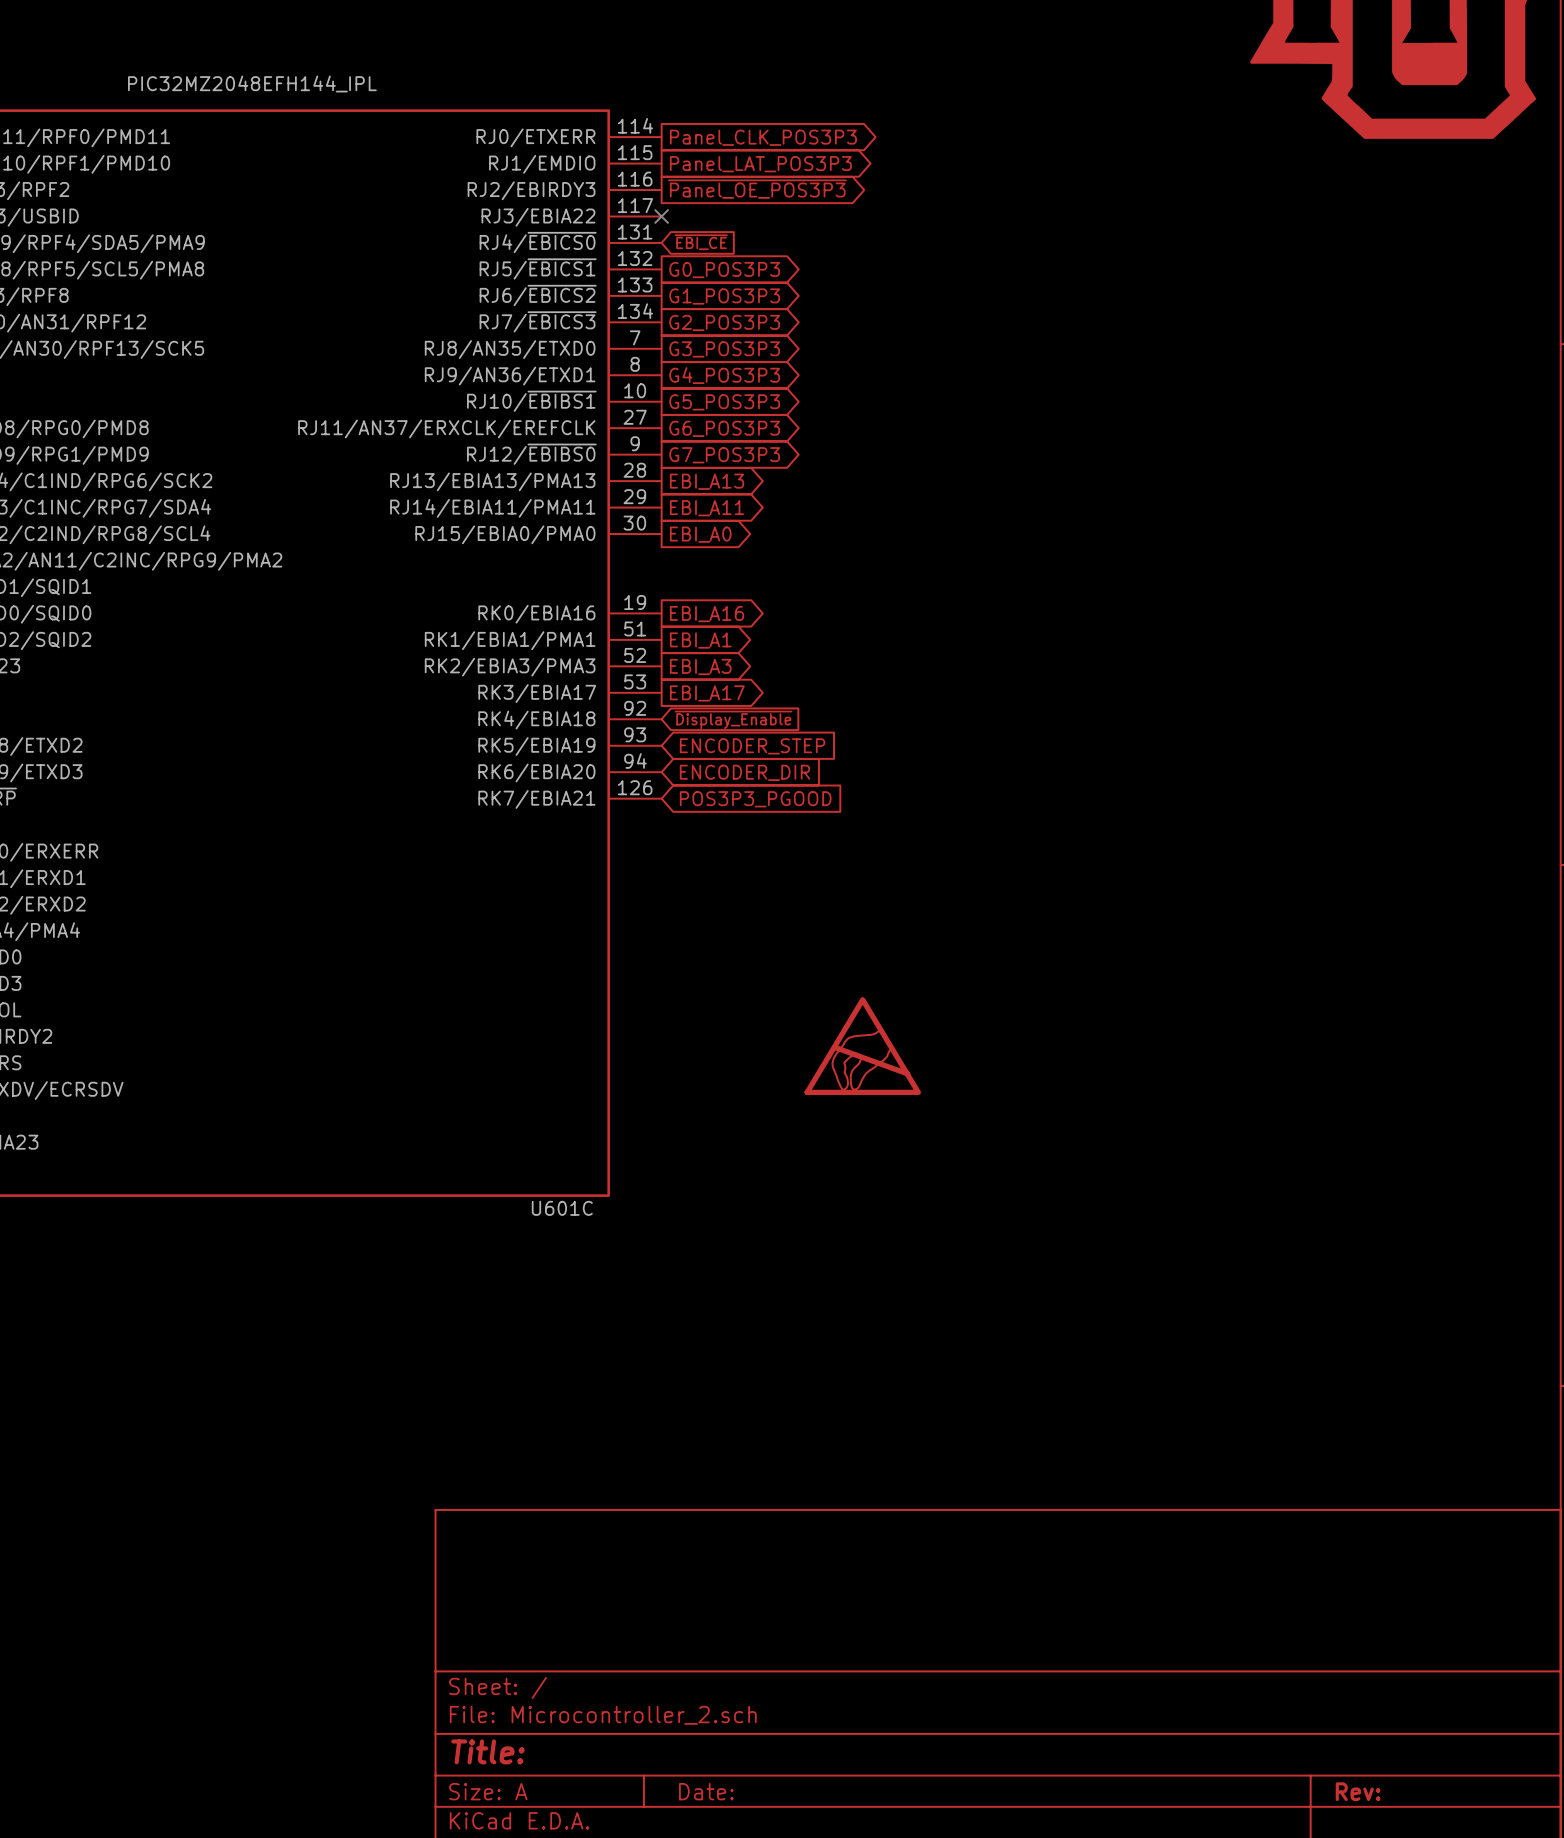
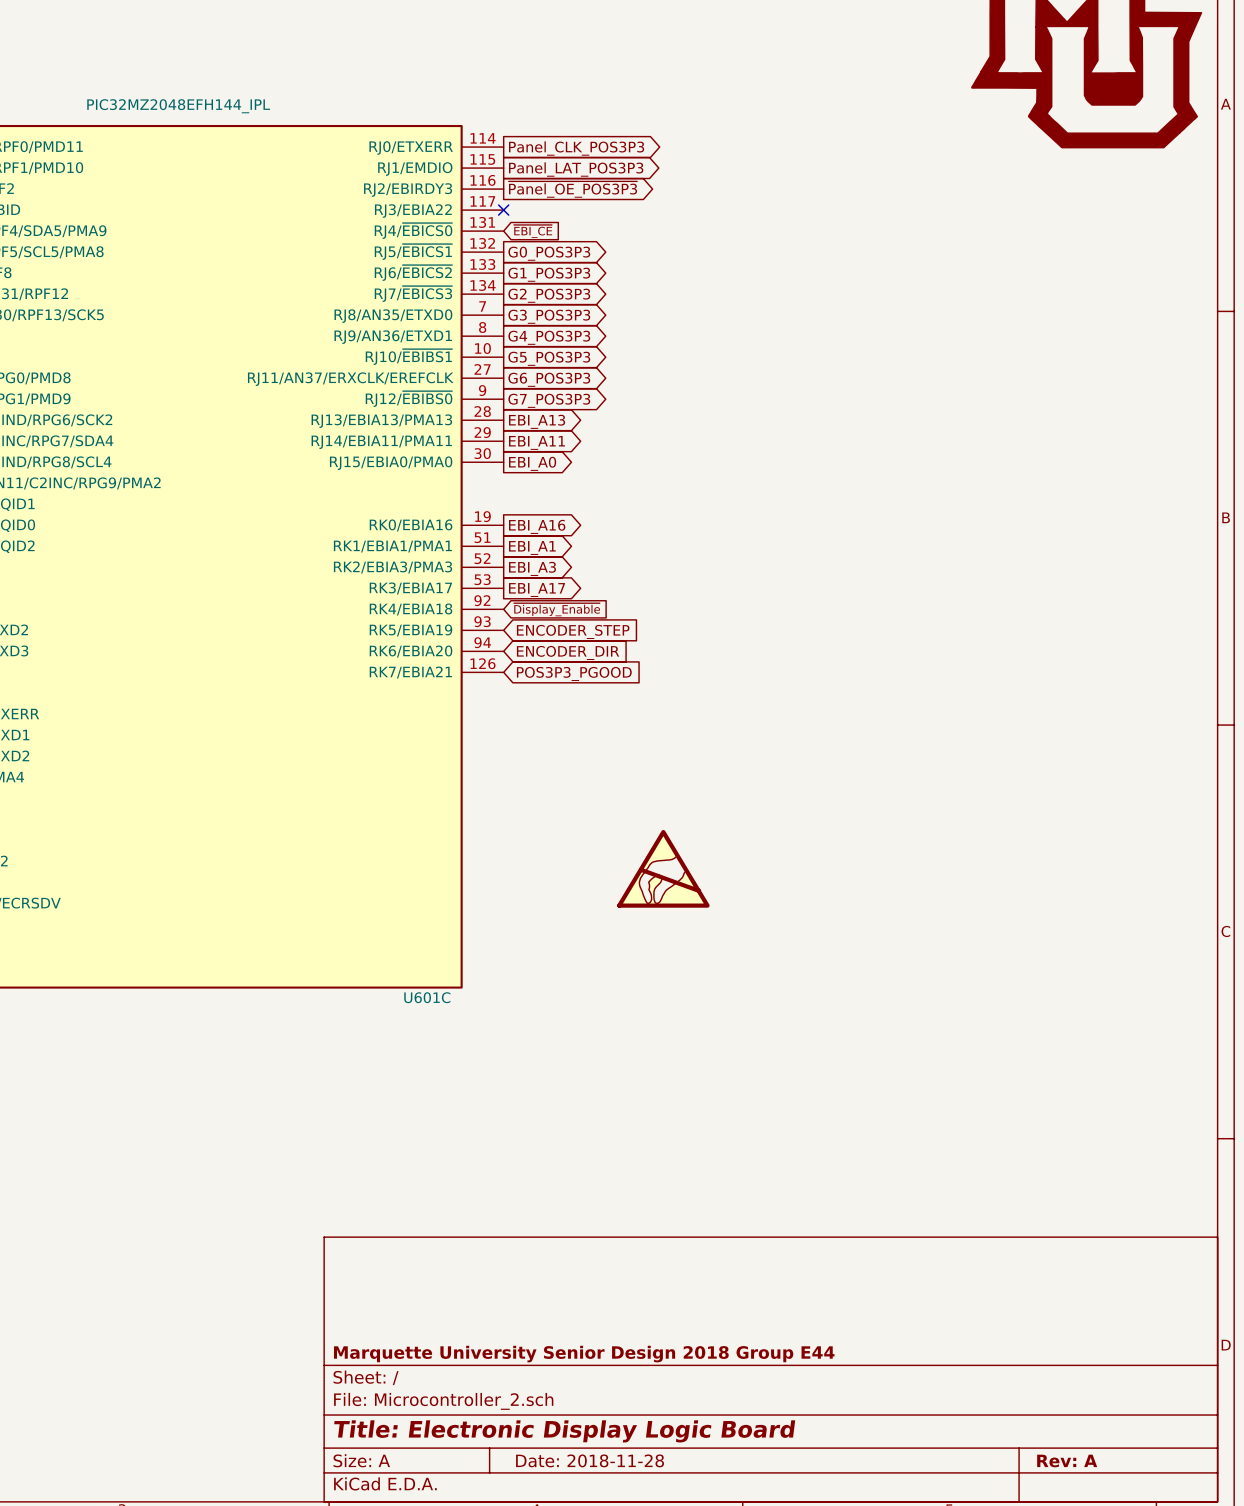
title block: none -> Marquette University Senior Design 2018 Group E44 (584, 1354)
title block: Title: (487, 1751) -> Title: Electronic Display Logic Board (564, 1431)
title block: Date: (706, 1791) -> Date: 2018-11-28 (590, 1460)
title block: Rev: (1358, 1791) -> Rev: A (1067, 1461)

